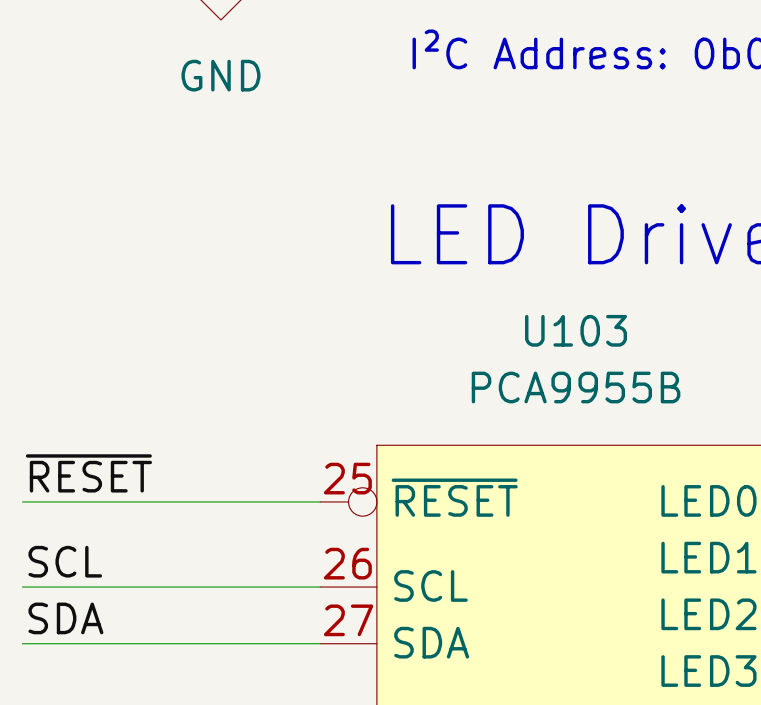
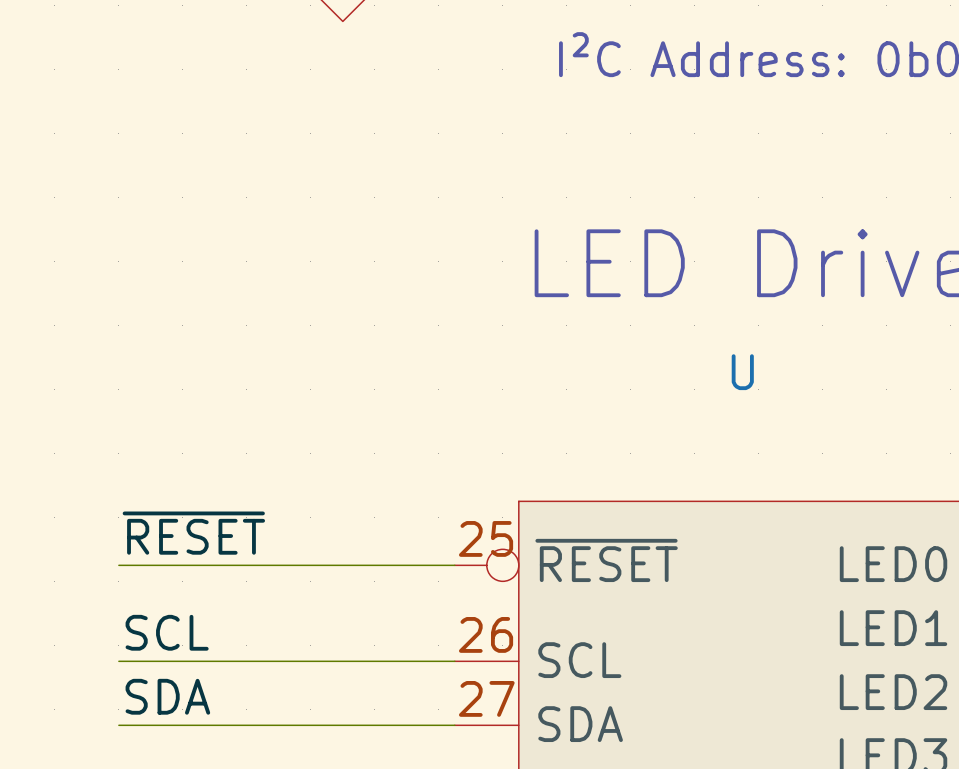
power symbol text: GND (220, 75) -> none
U103 name: U103 (576, 330) -> U (742, 372)
U103 value: PCA9955B (576, 387) -> none

